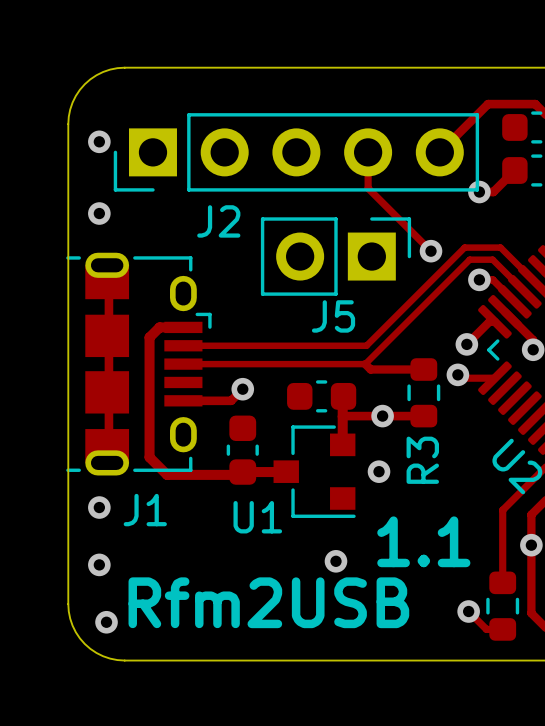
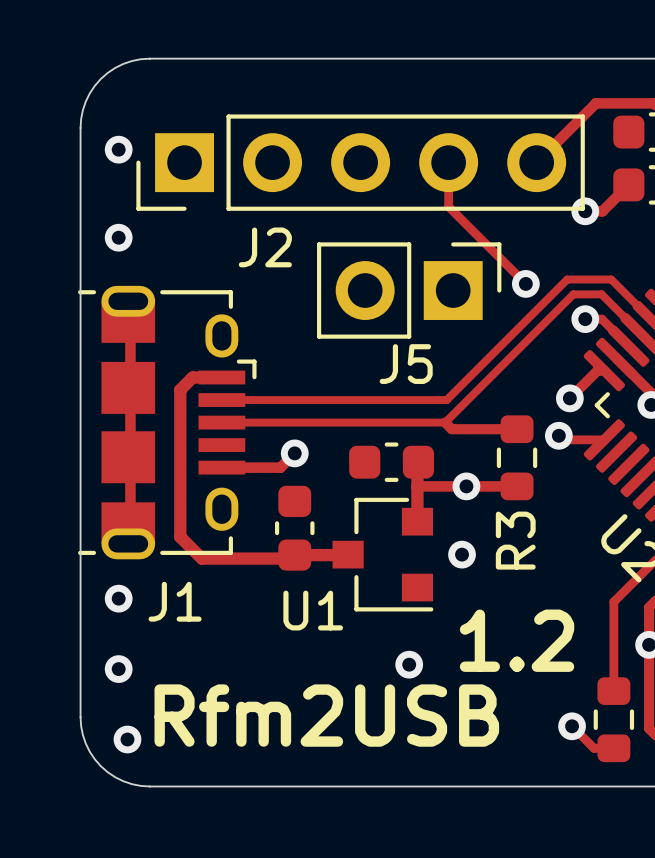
text: 1.1 (423, 541) -> 1.2 (517, 640)

